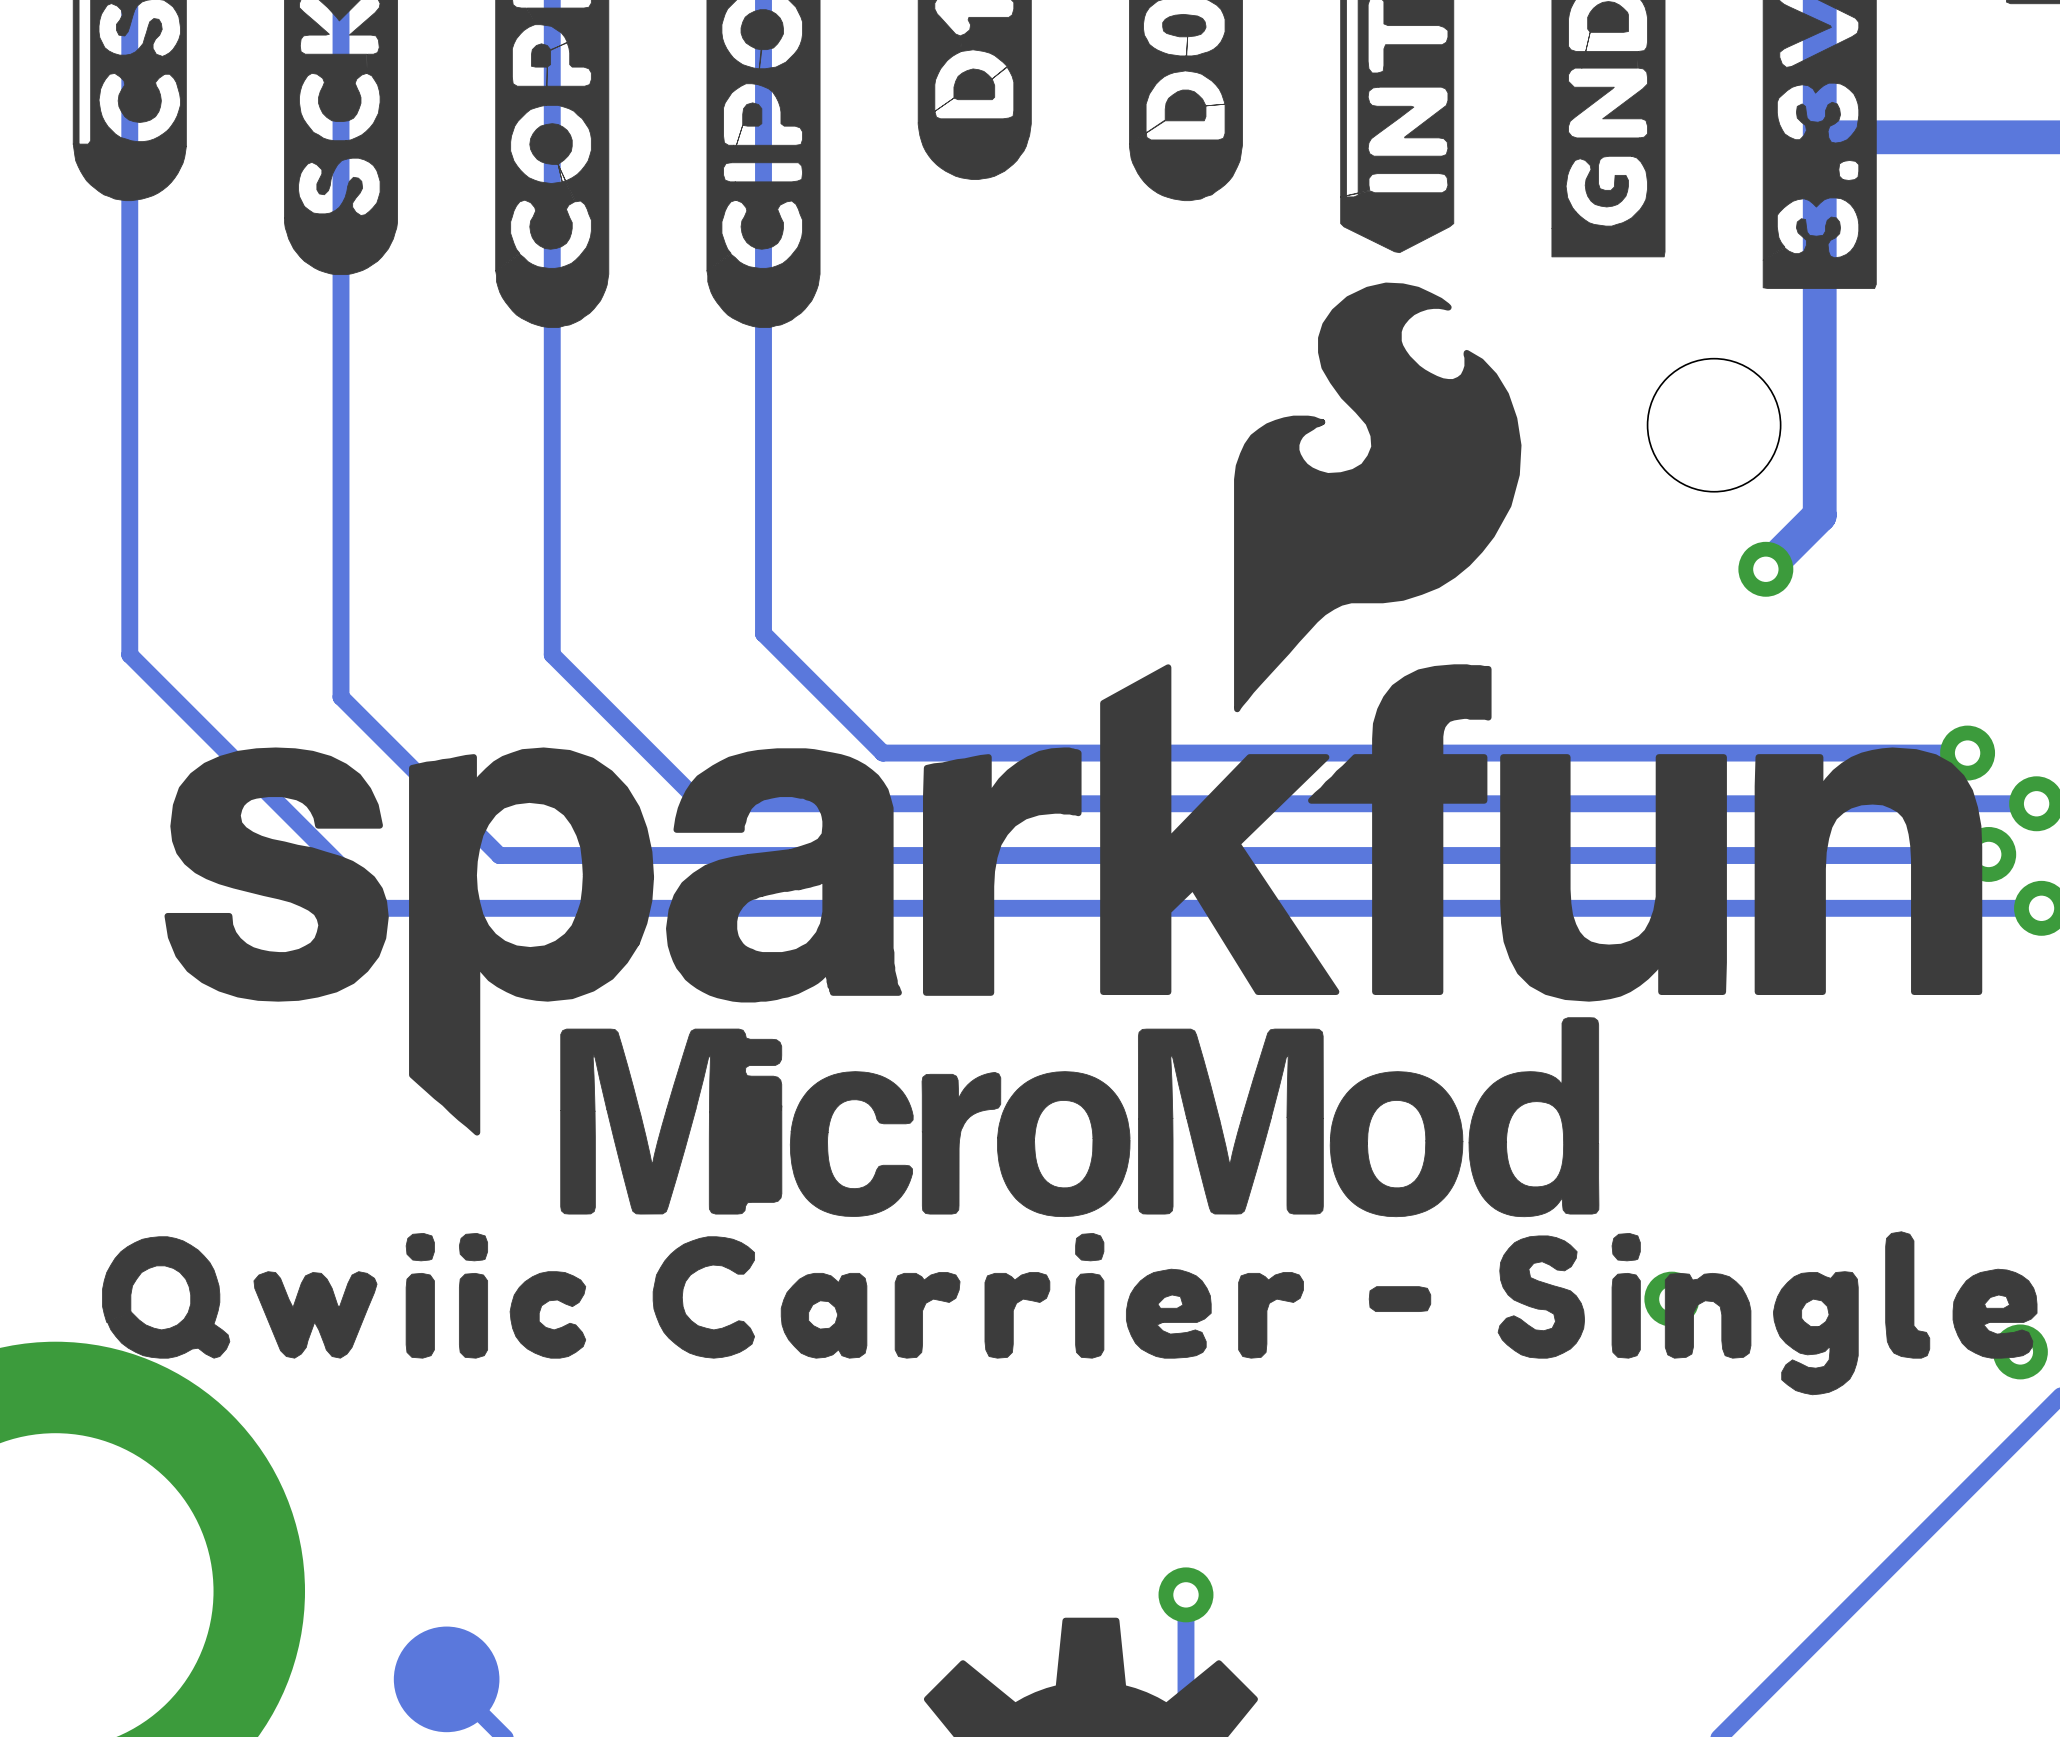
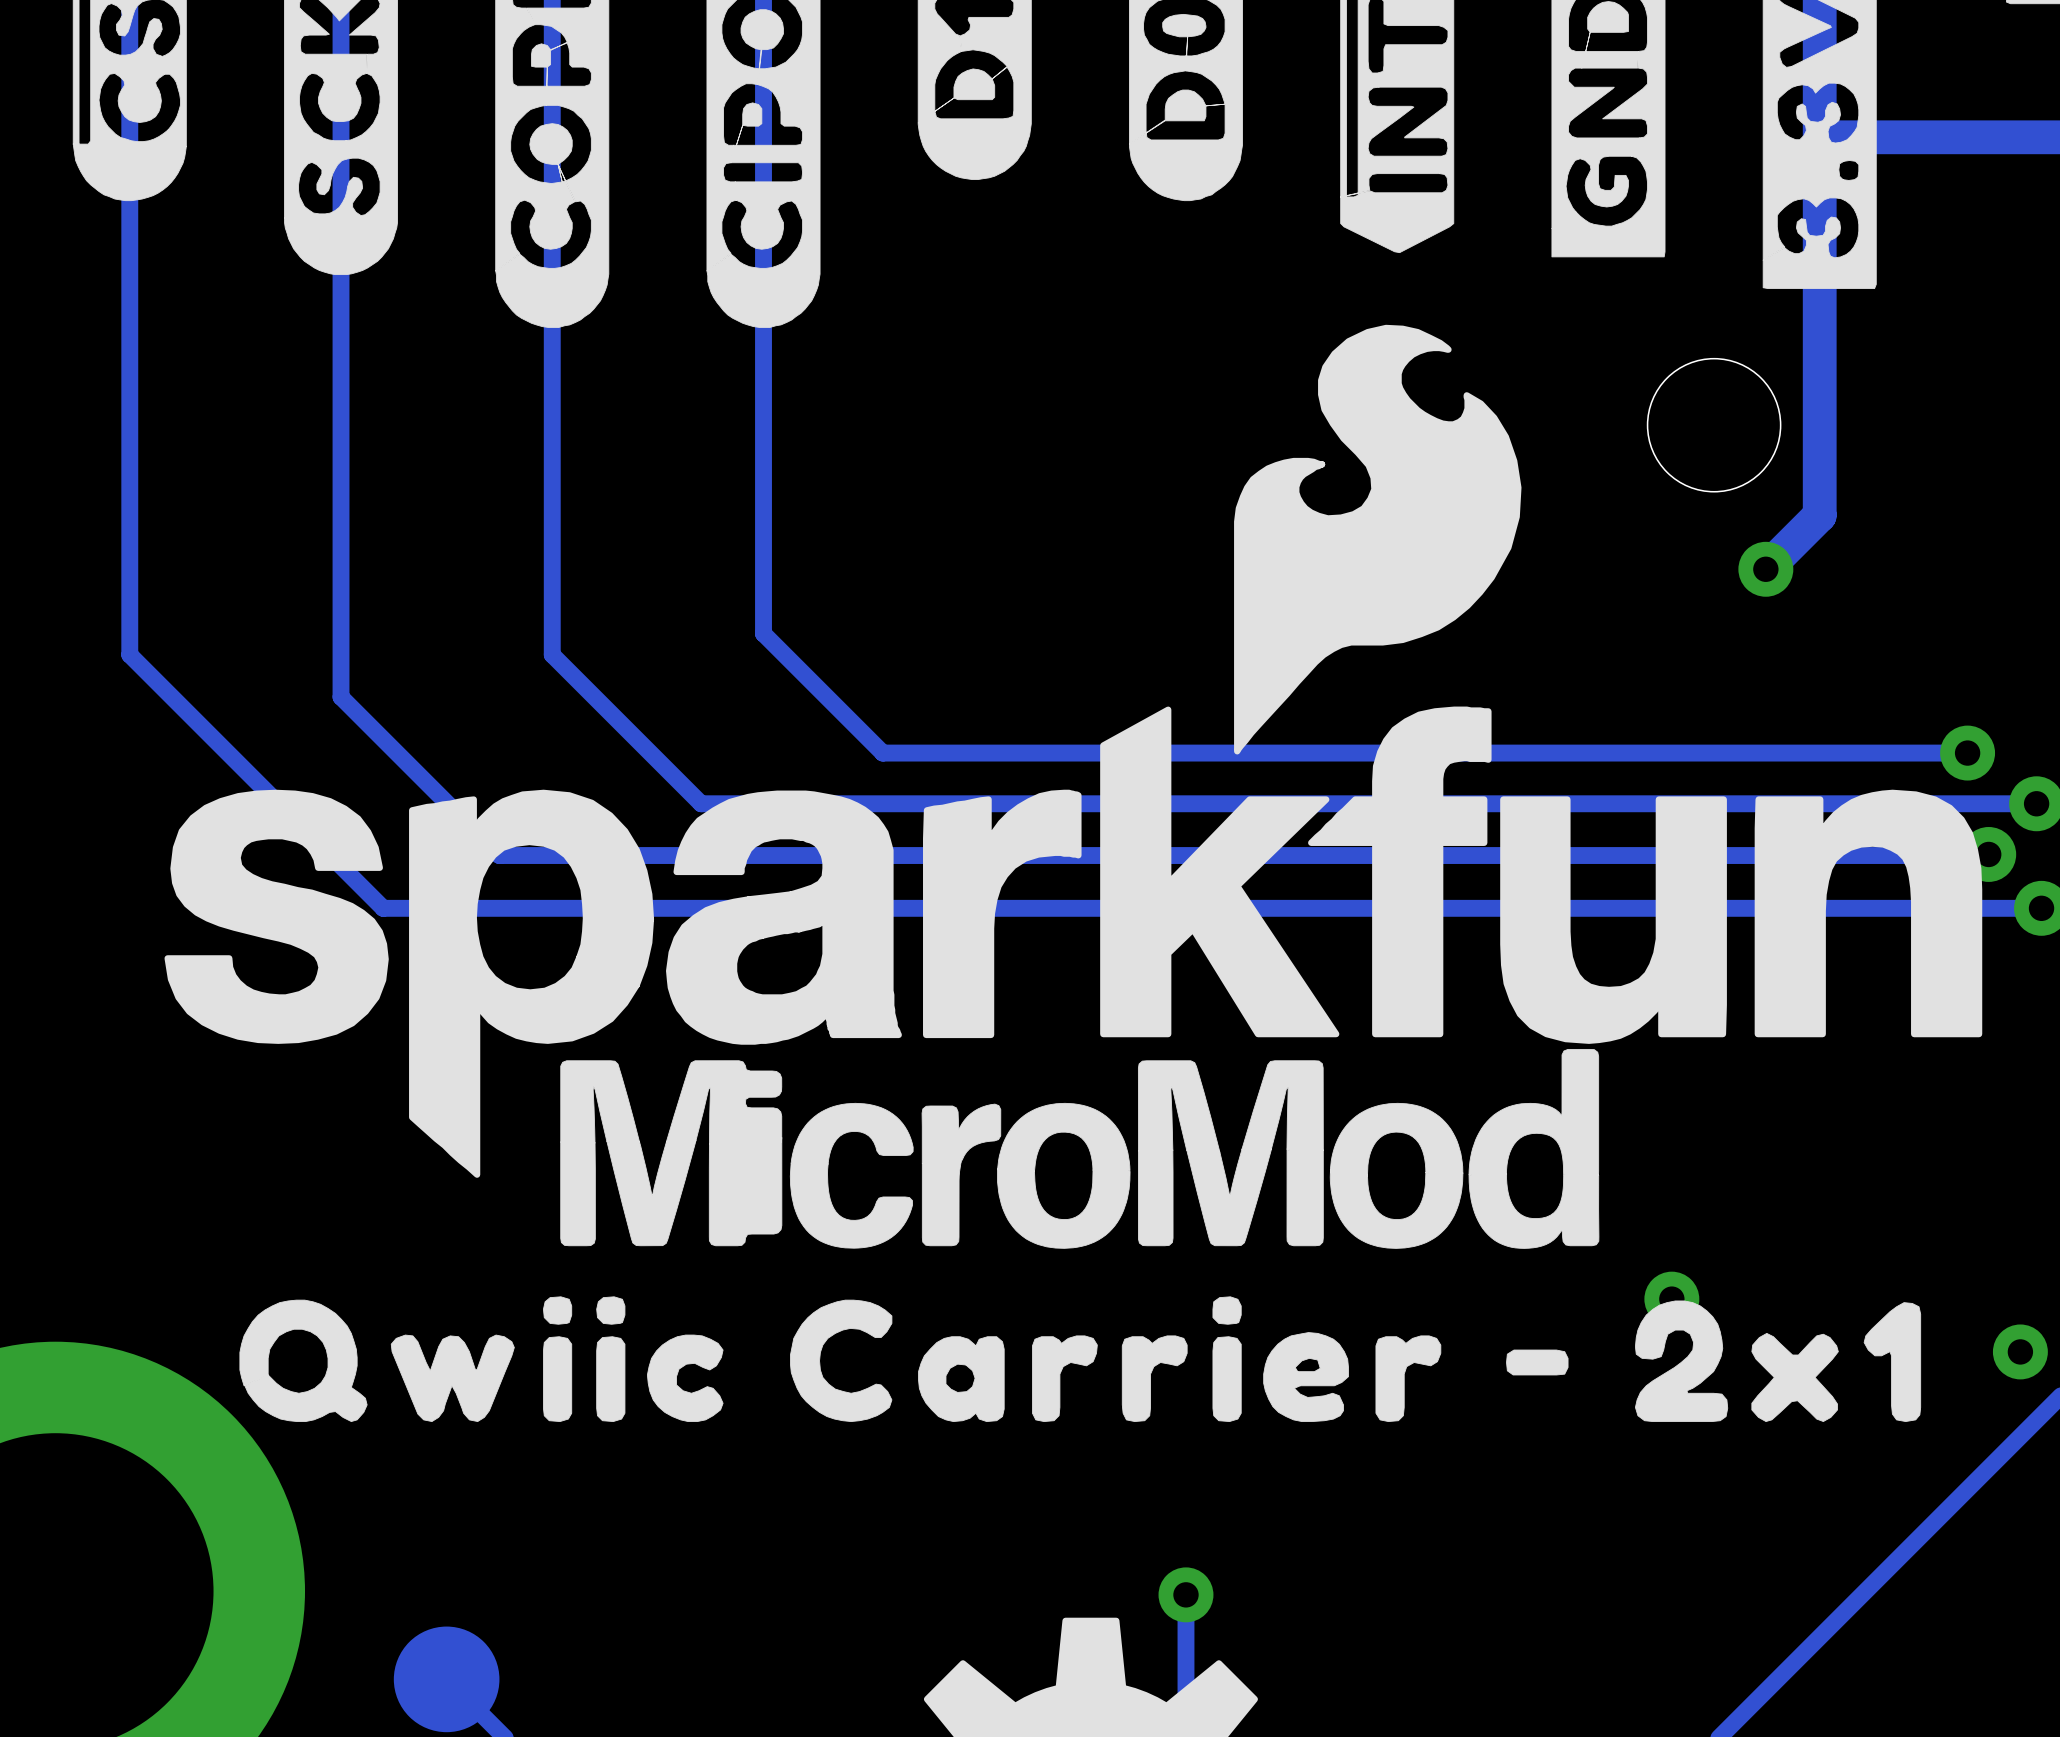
drawing position: (1073, 709) -> (1073, 751)
drawing position: (1079, 1117) -> (1079, 1148)
drawing shape: [102, 1231, 2038, 1396] -> [239, 1296, 1922, 1422]

